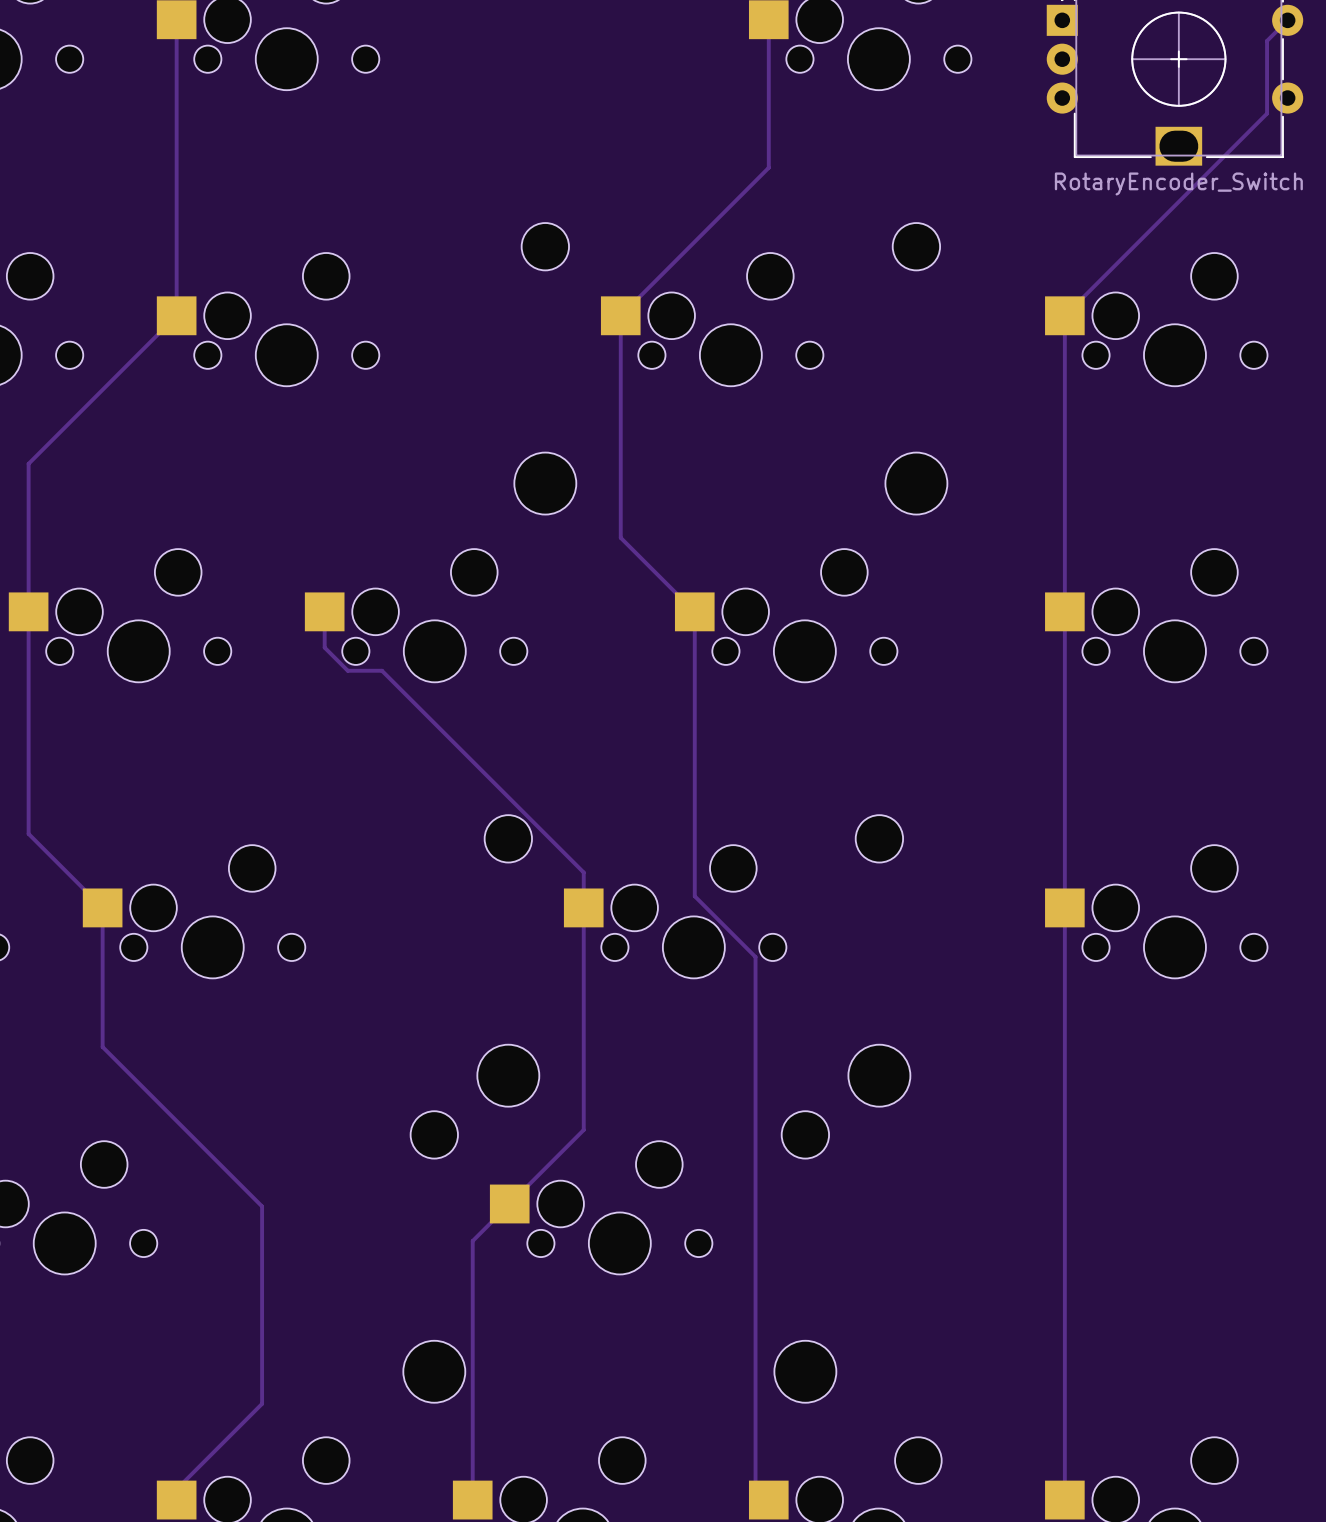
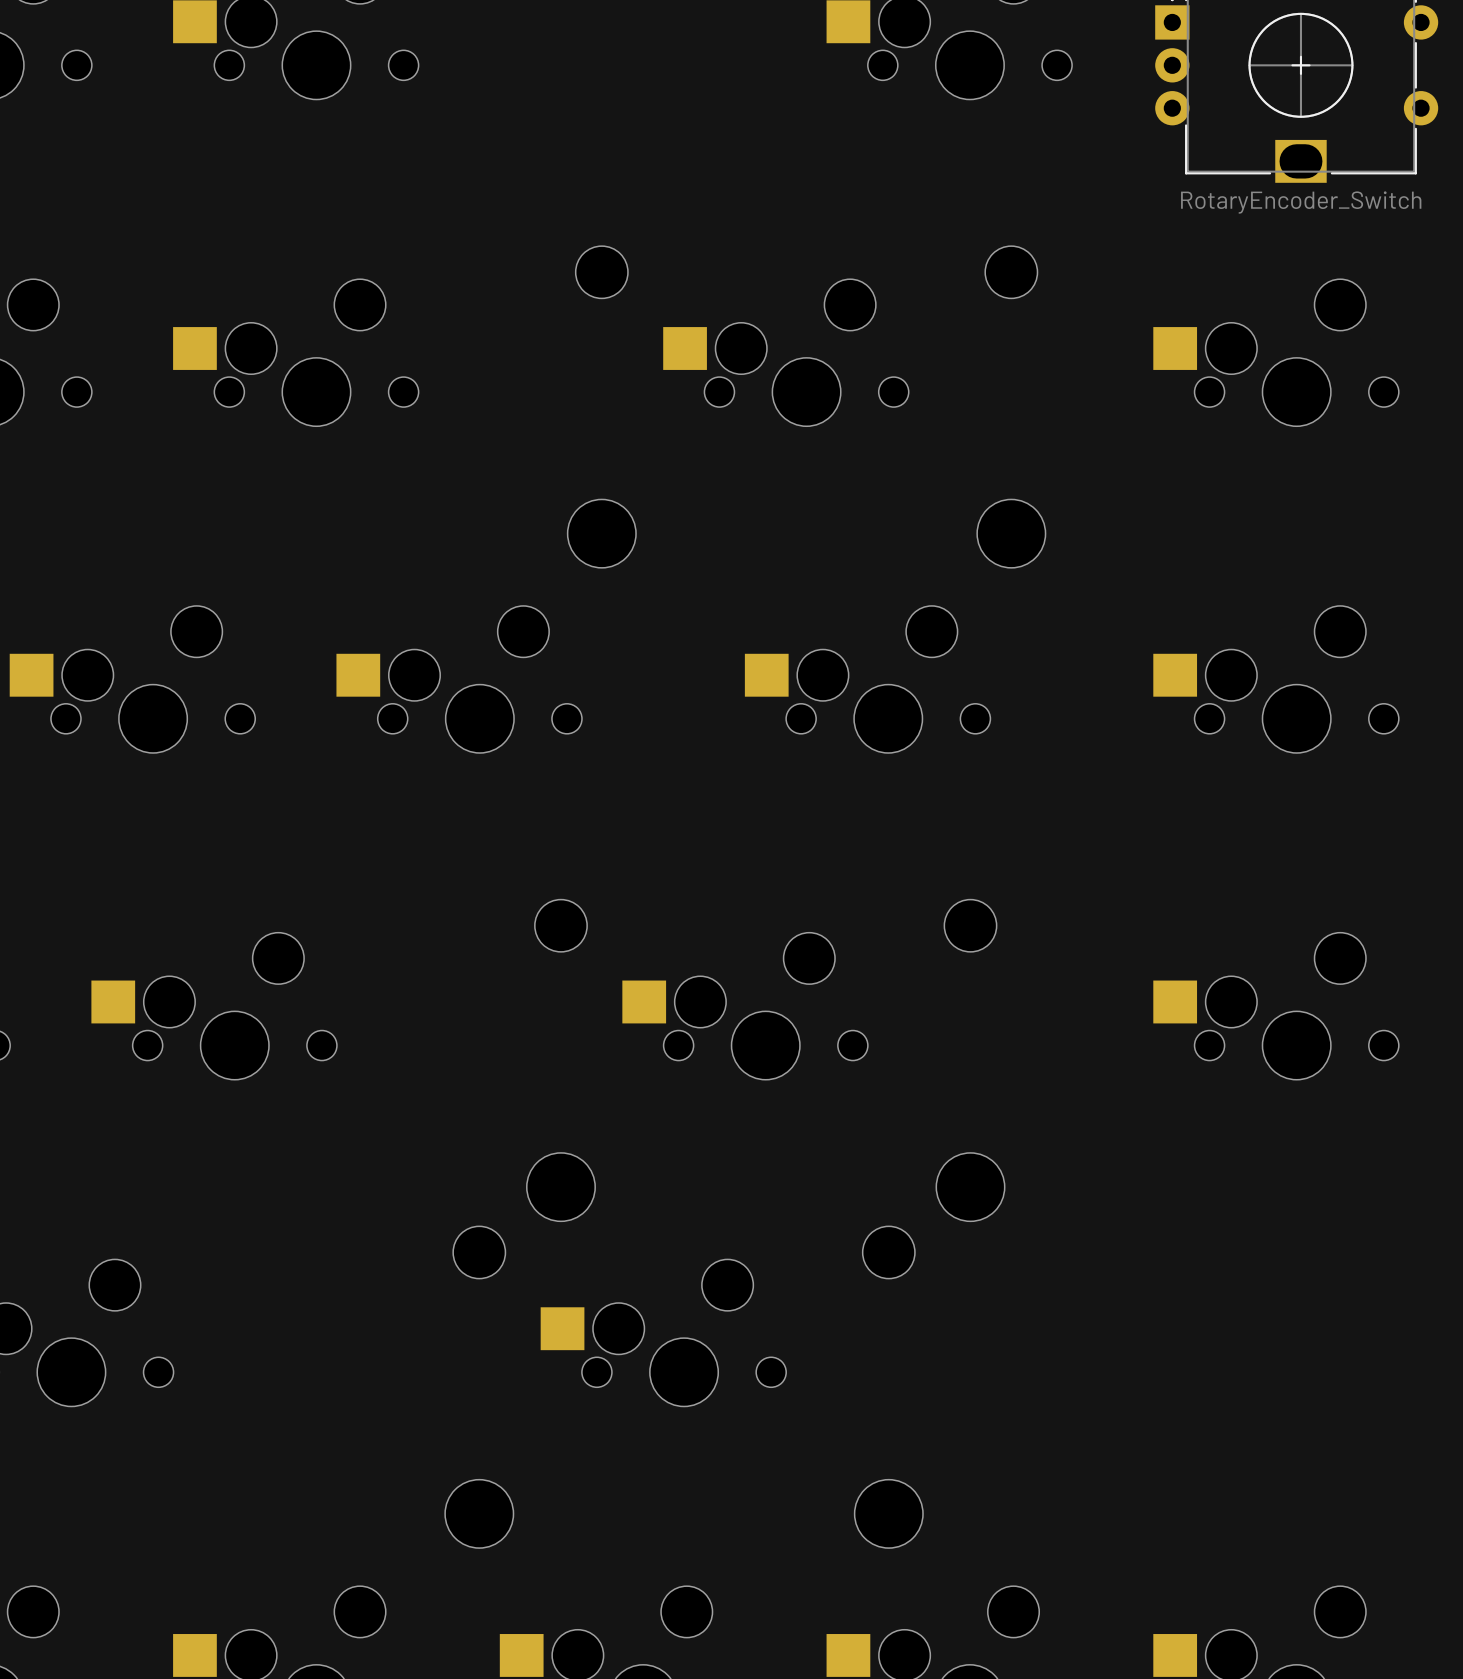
track: (176, 19) (176, 315) (28, 463) (28, 833) (102, 907) (102, 1047) (262, 1206) (262, 1403) (176, 1489) (176, 1500) -> none
track: (768, 19) (768, 167) (620, 315) (620, 537) (694, 611) (694, 896) (755, 957) (755, 1486) (768, 1500) -> none
track: (1287, 20) (1267, 40) (1267, 113) (1064, 315) (1064, 1500) -> none
track: (324, 611) (324, 647) (347, 670) (381, 670) (583, 872) (583, 1129) (472, 1241) (472, 1500) -> none

